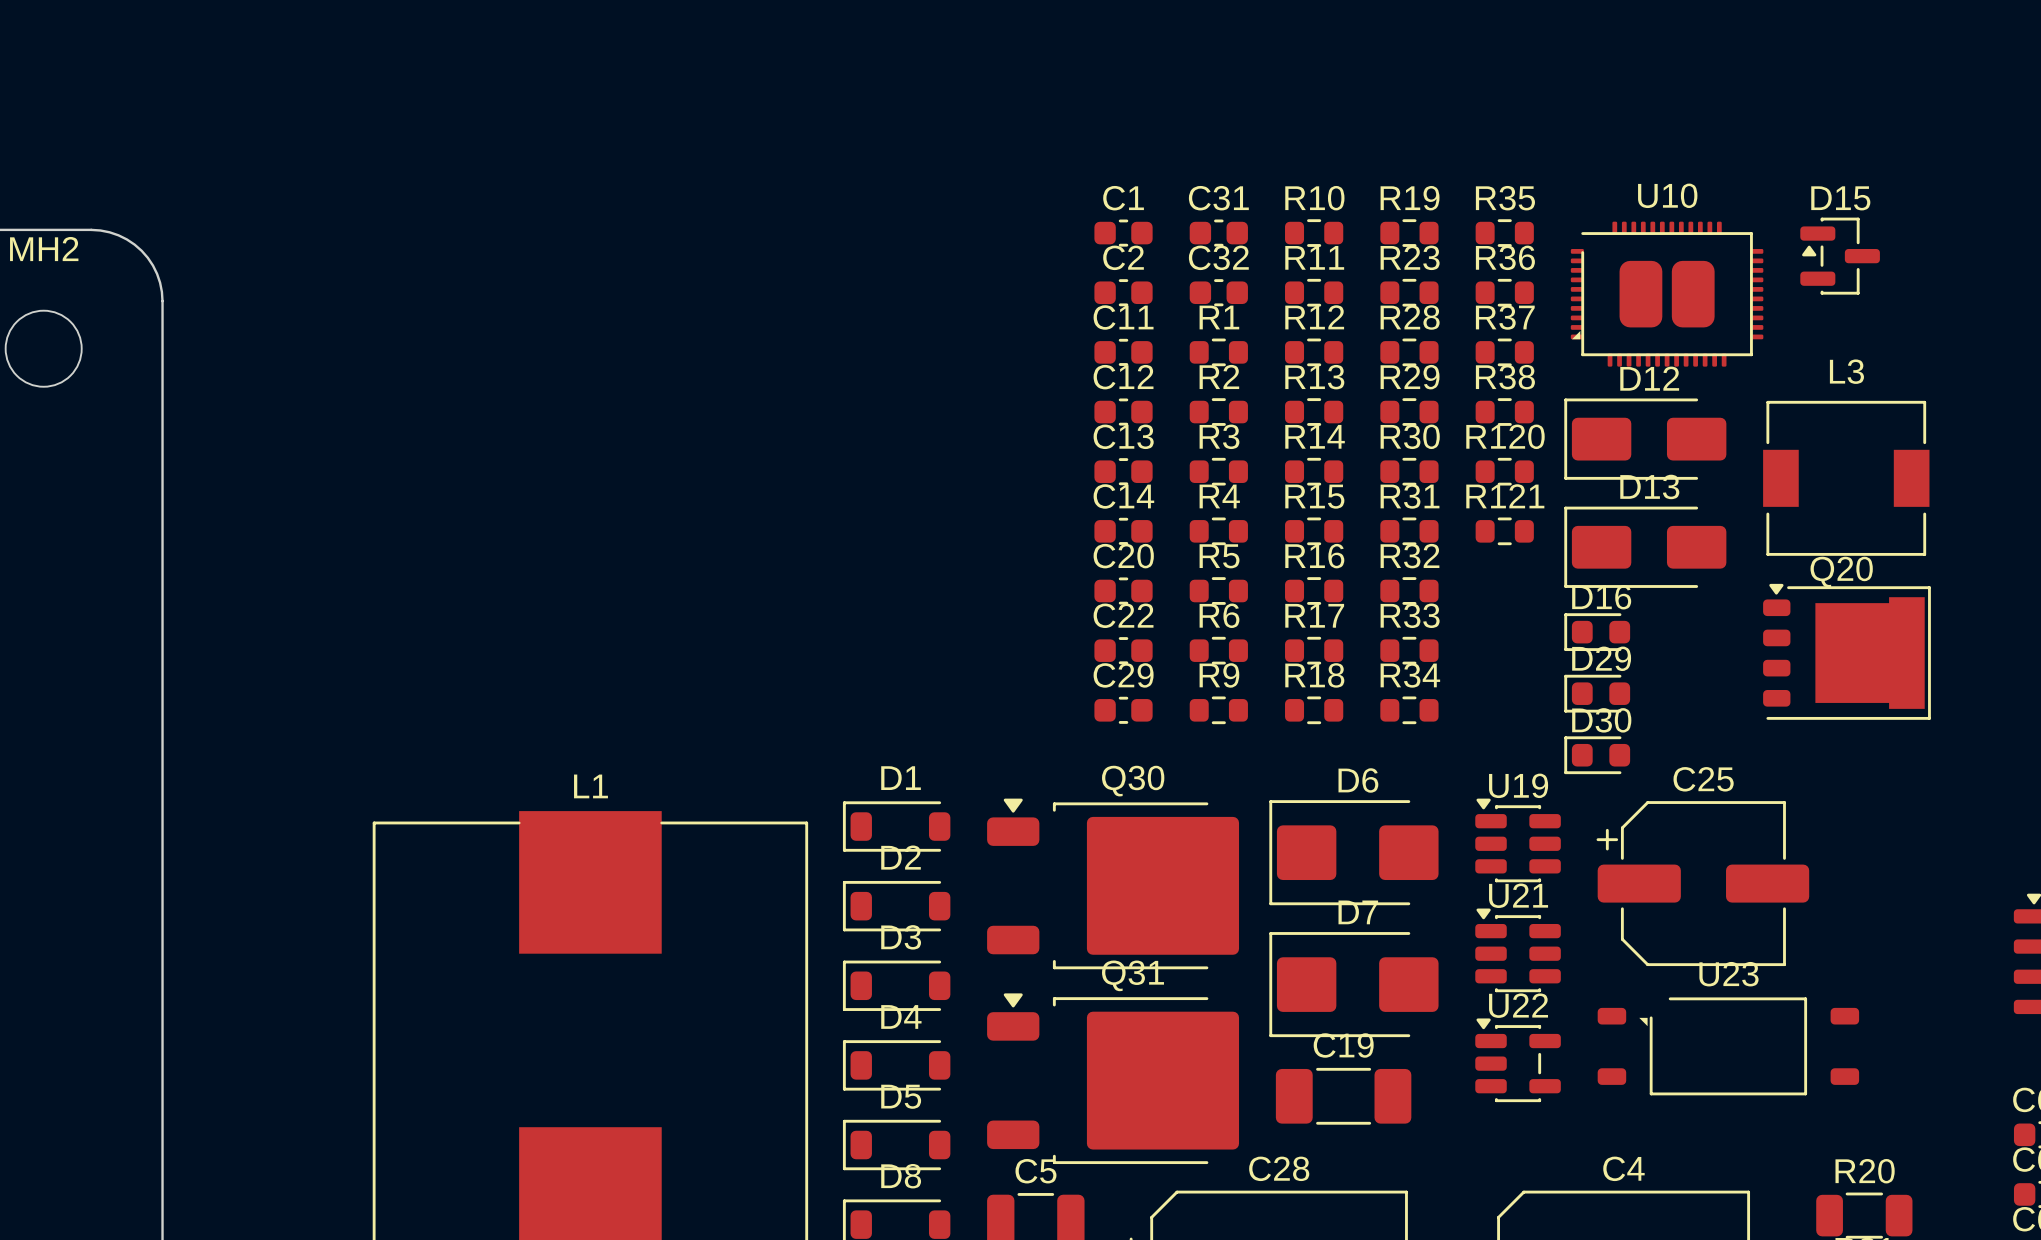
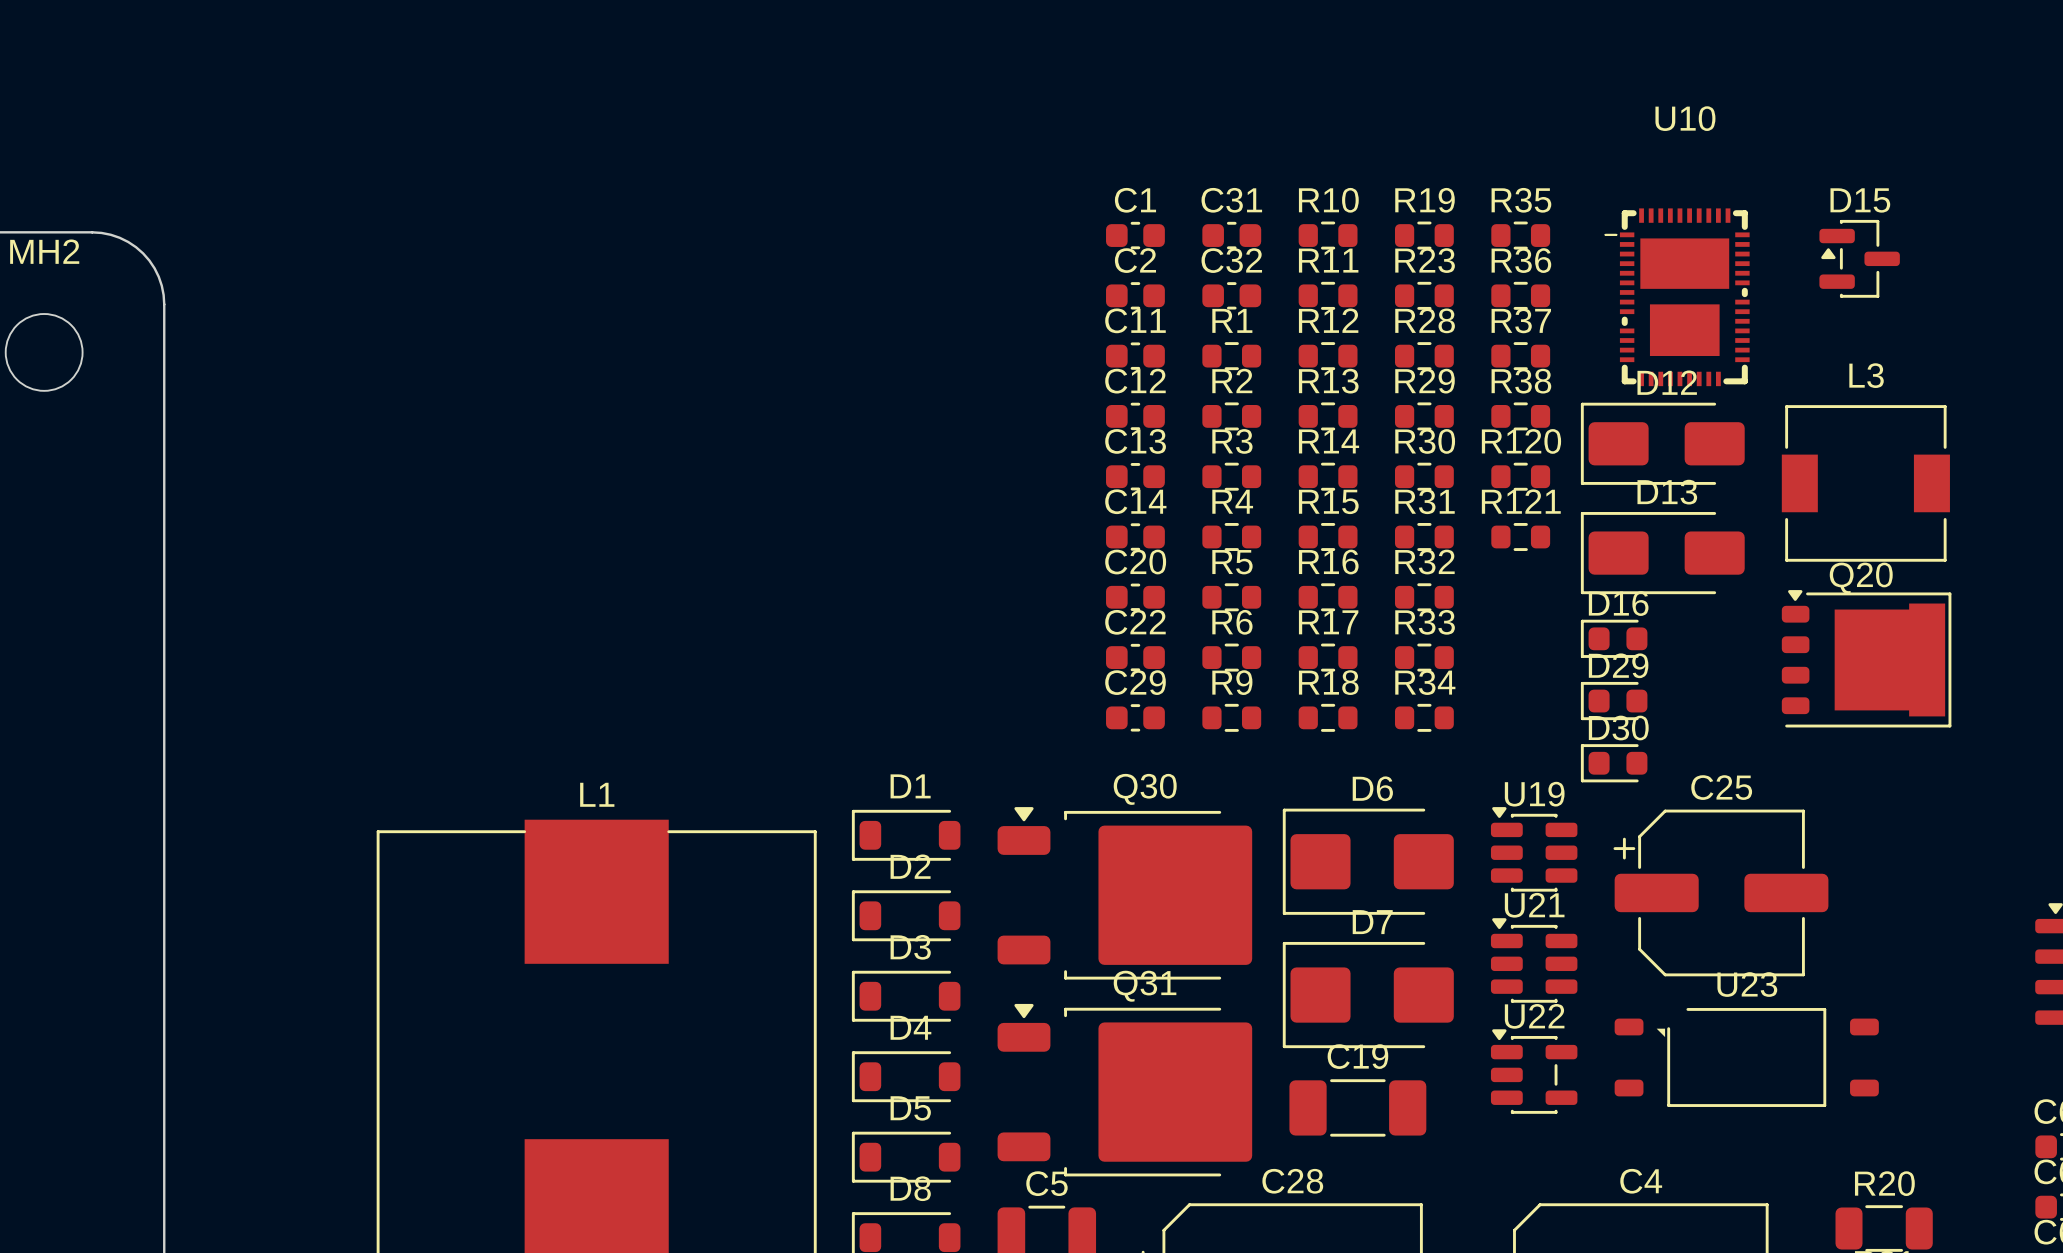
U10 name position: U10 (1667, 195) -> U10 (1685, 118)
U10 footprint: [1570, 221, 1764, 367] -> [1605, 208, 1750, 387]

